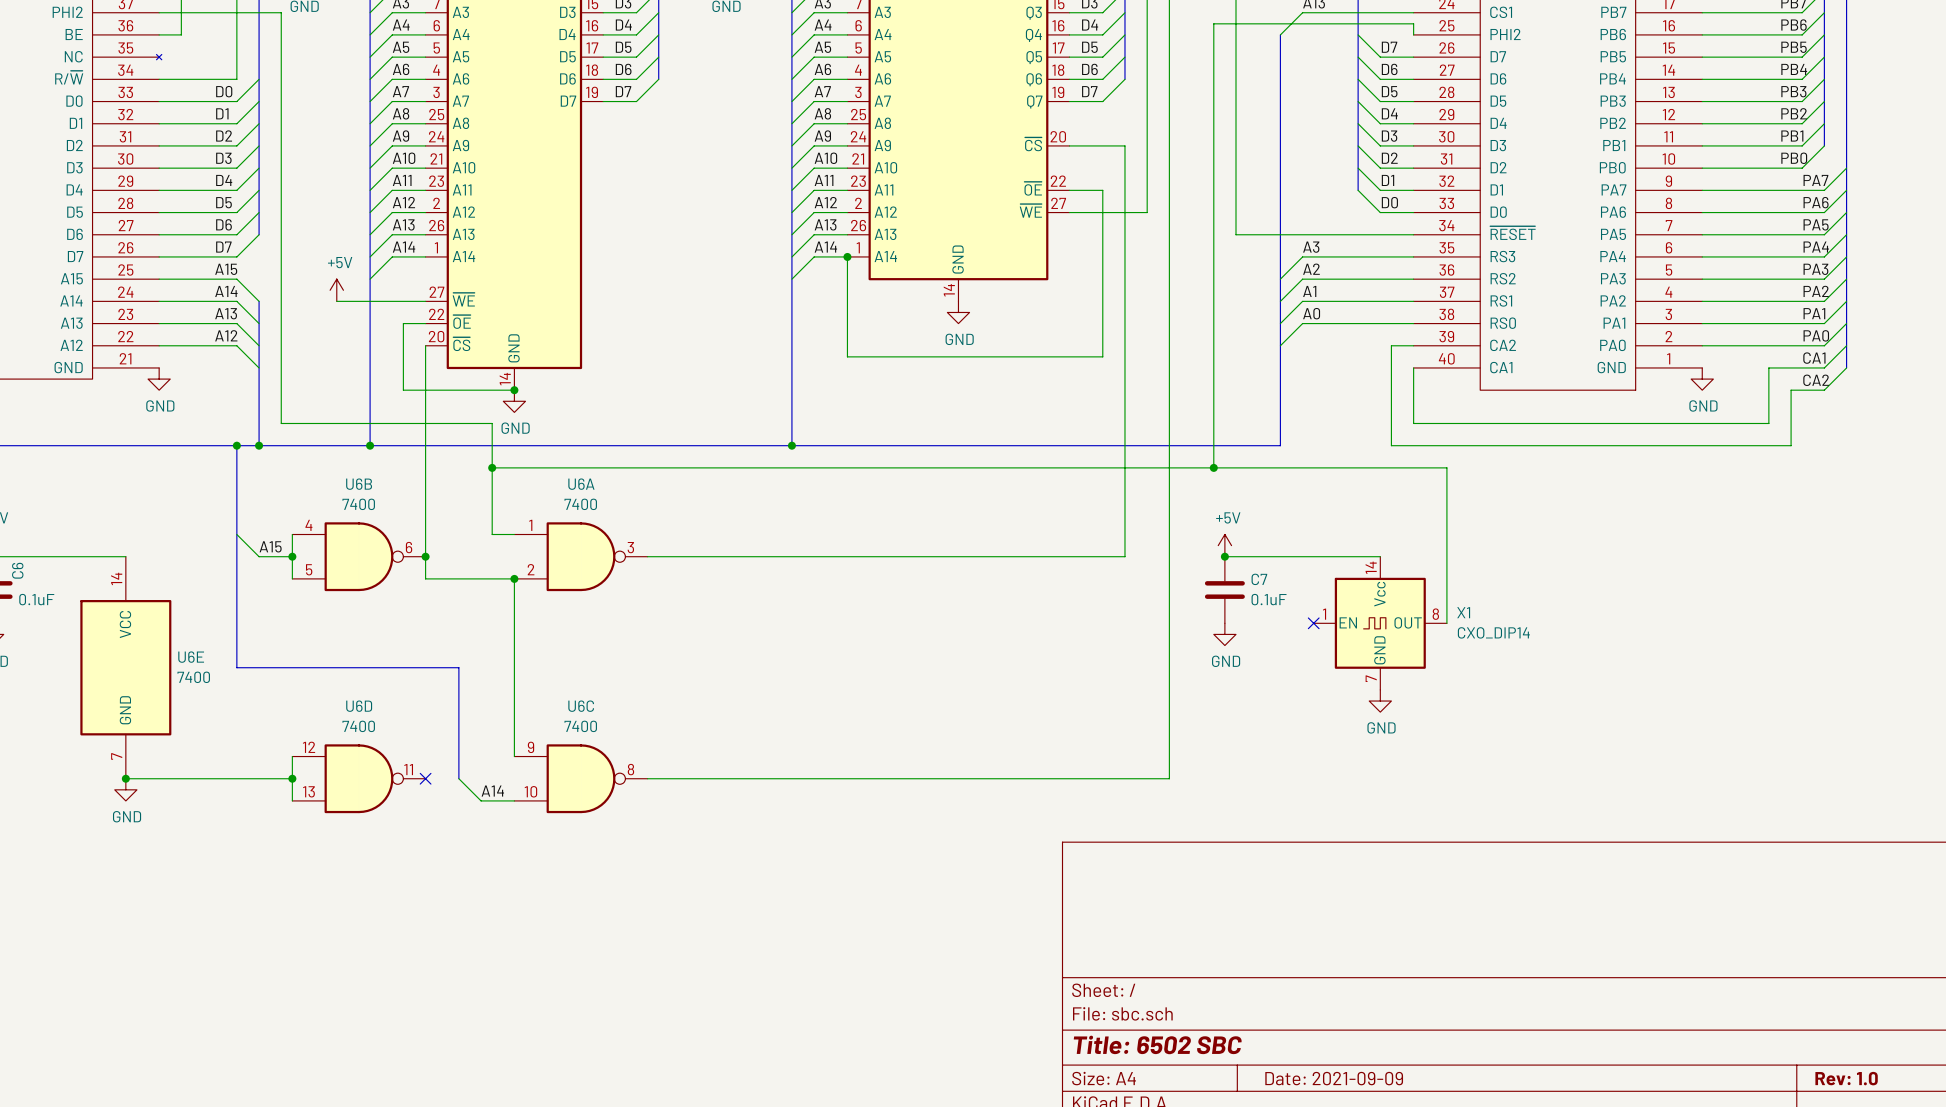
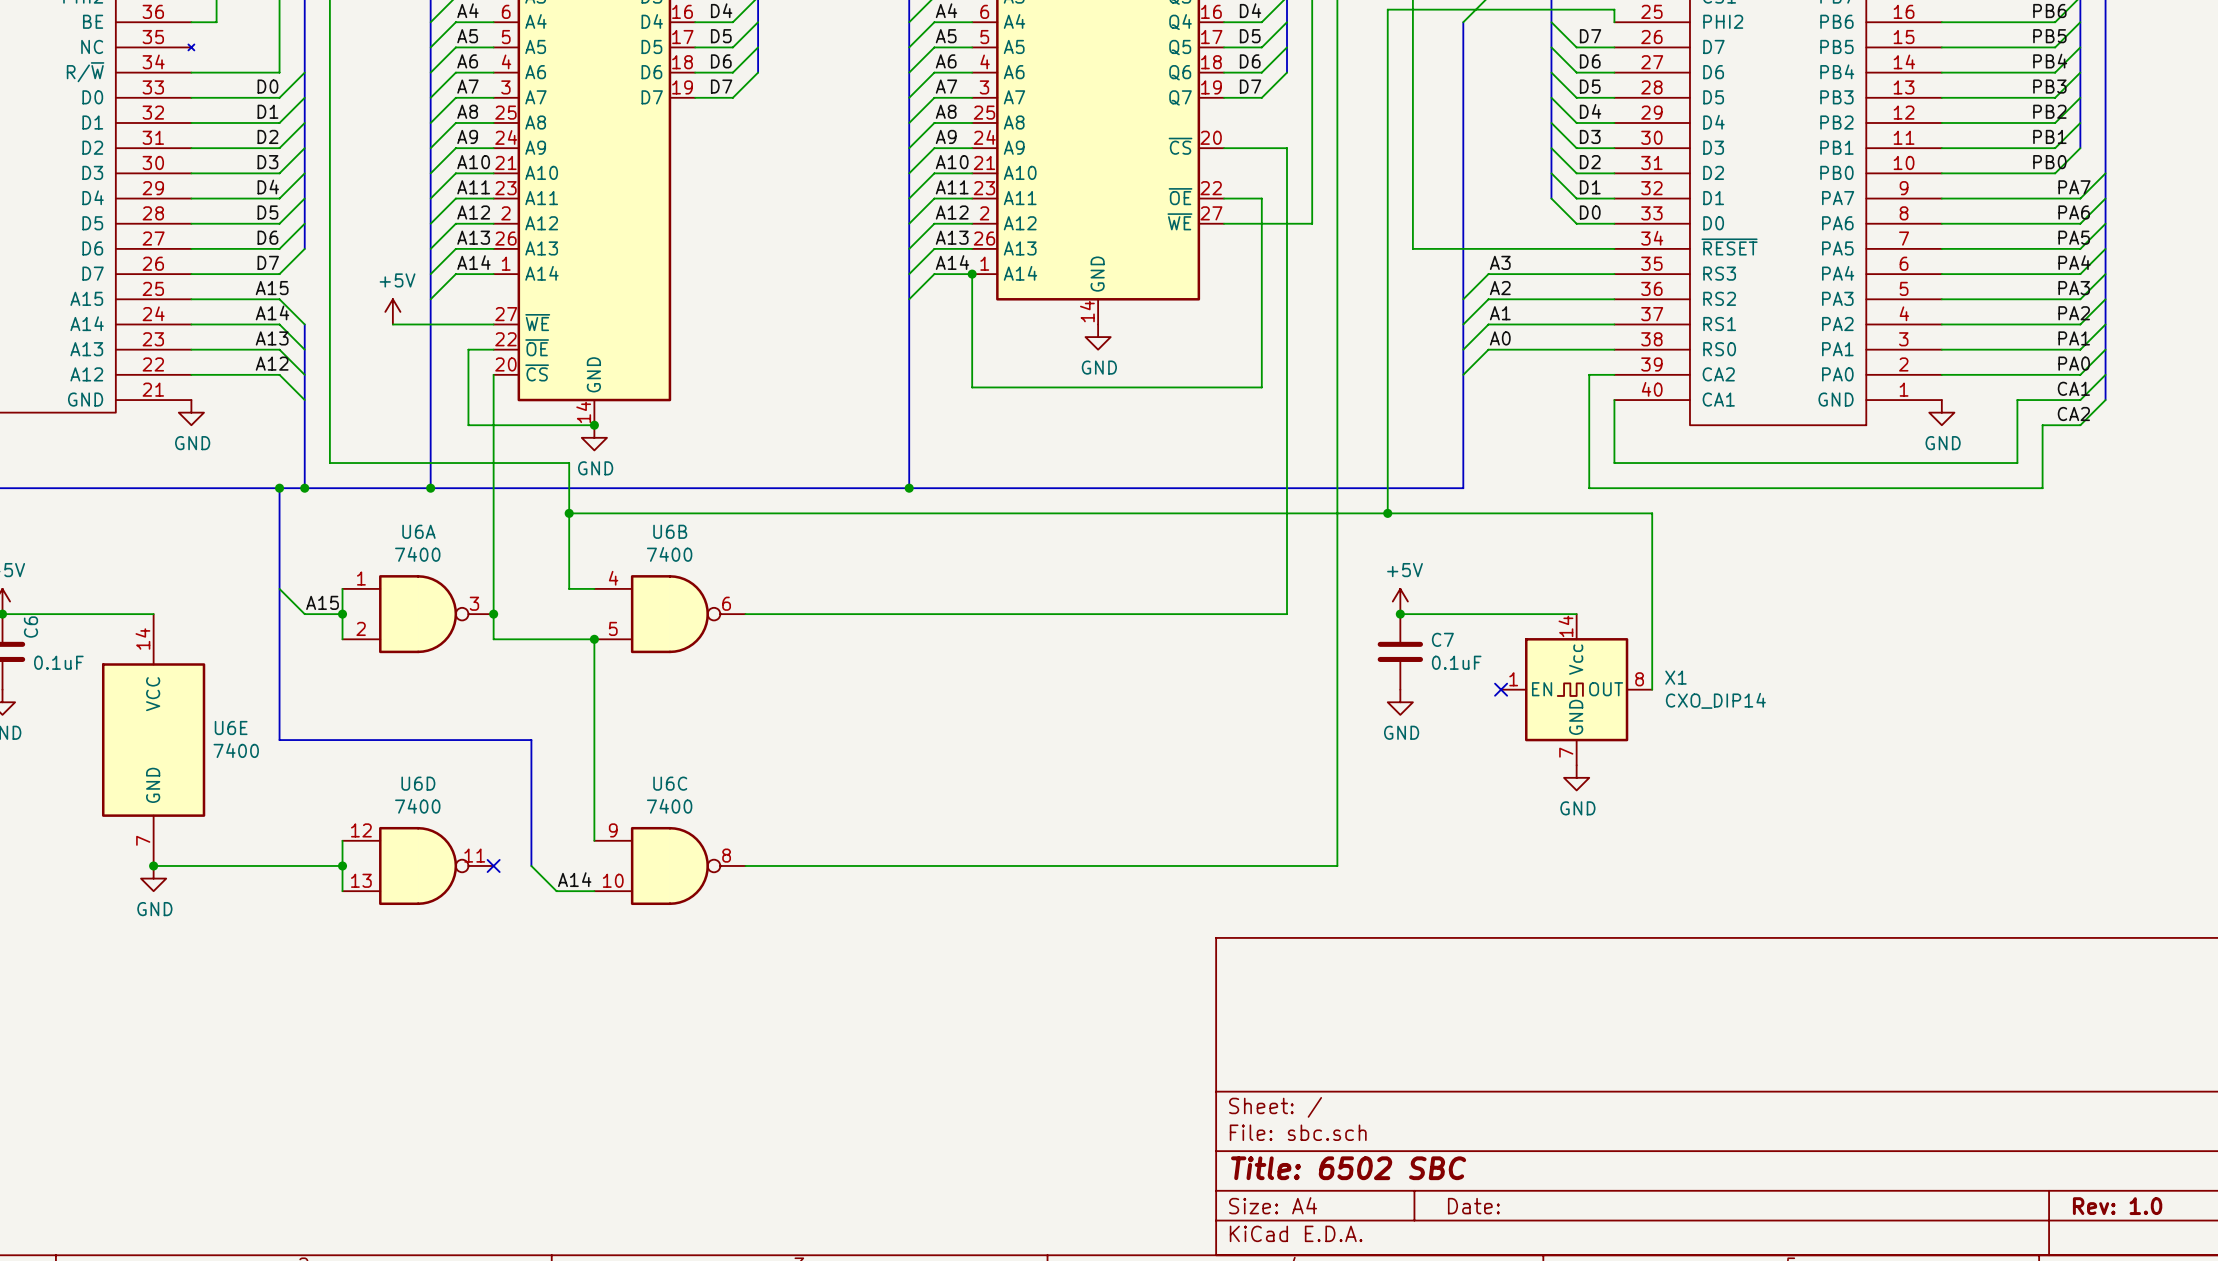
U6B position: (358, 556) -> (669, 614)
U6A position: (581, 556) -> (418, 614)
title block: Date: 2021-09-09 (1334, 1078) -> Date: (1473, 1206)

